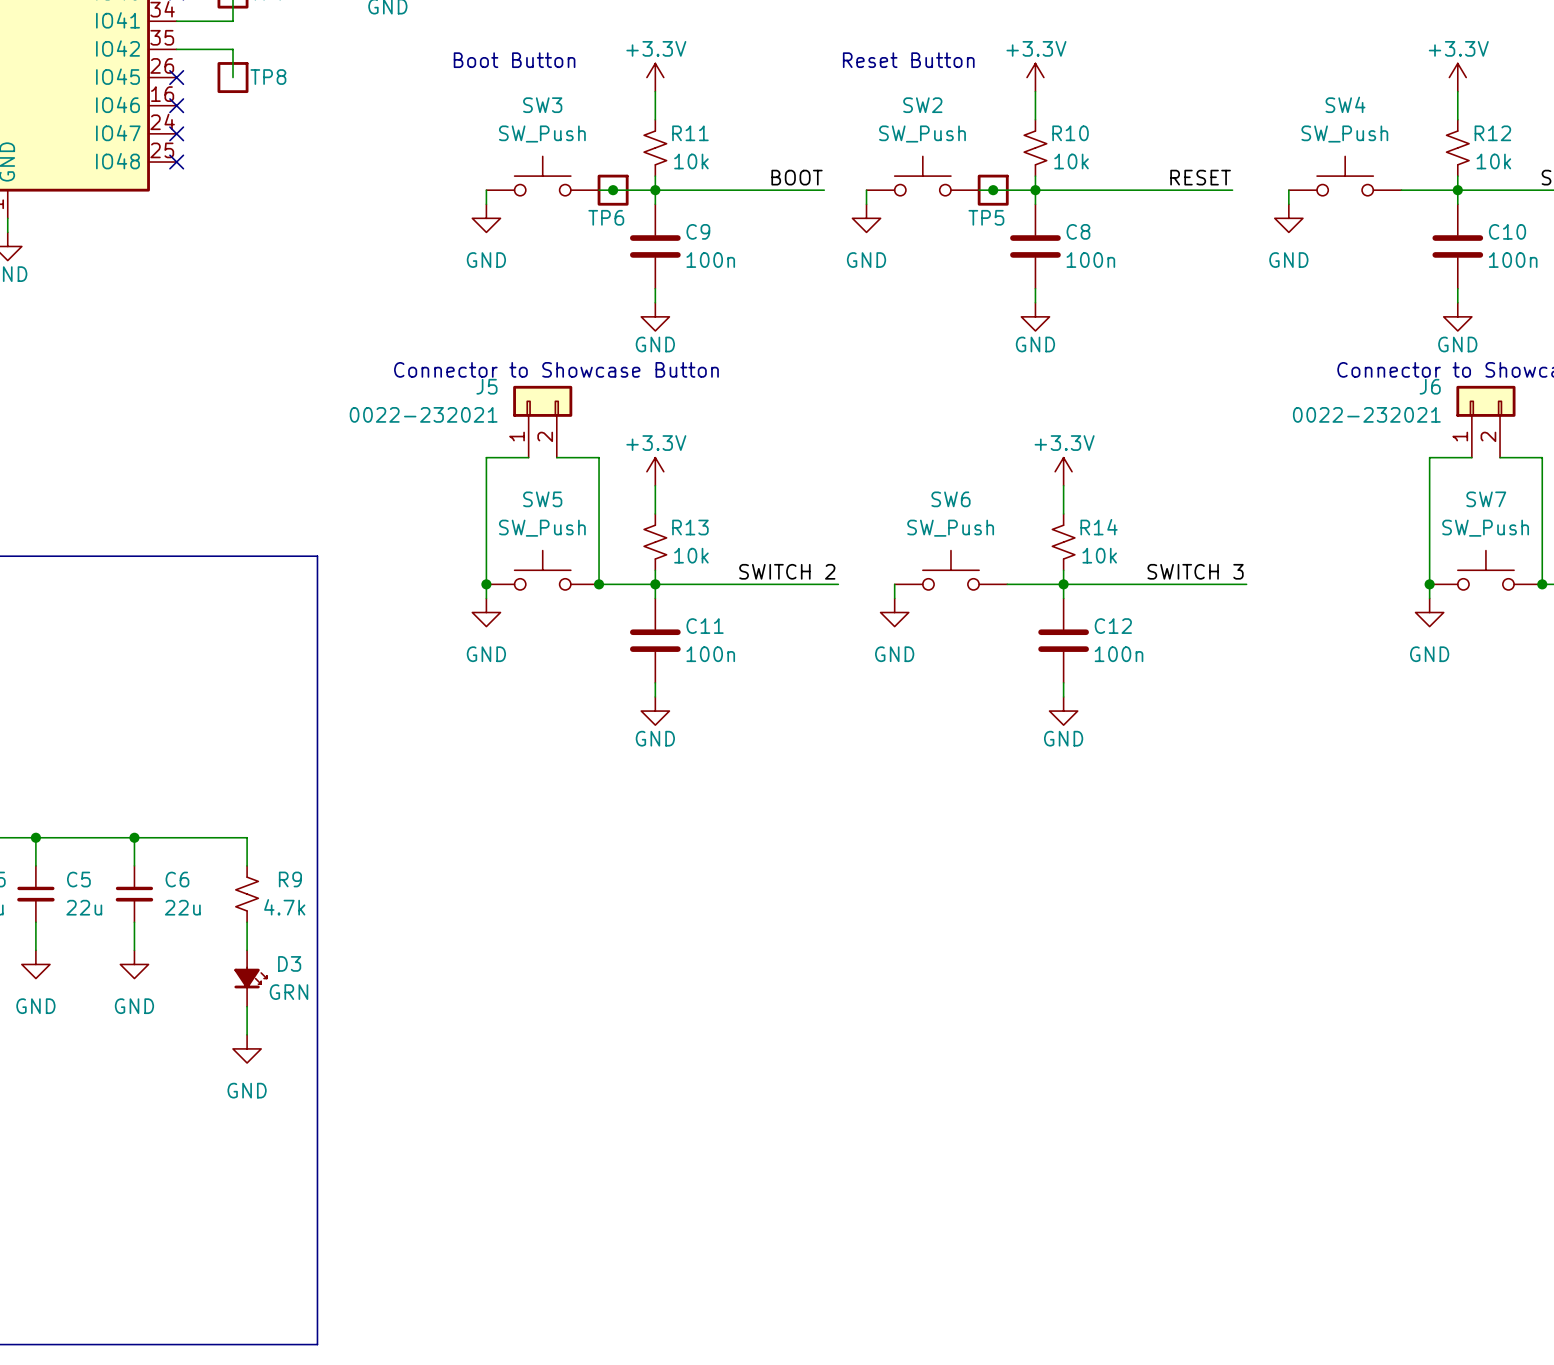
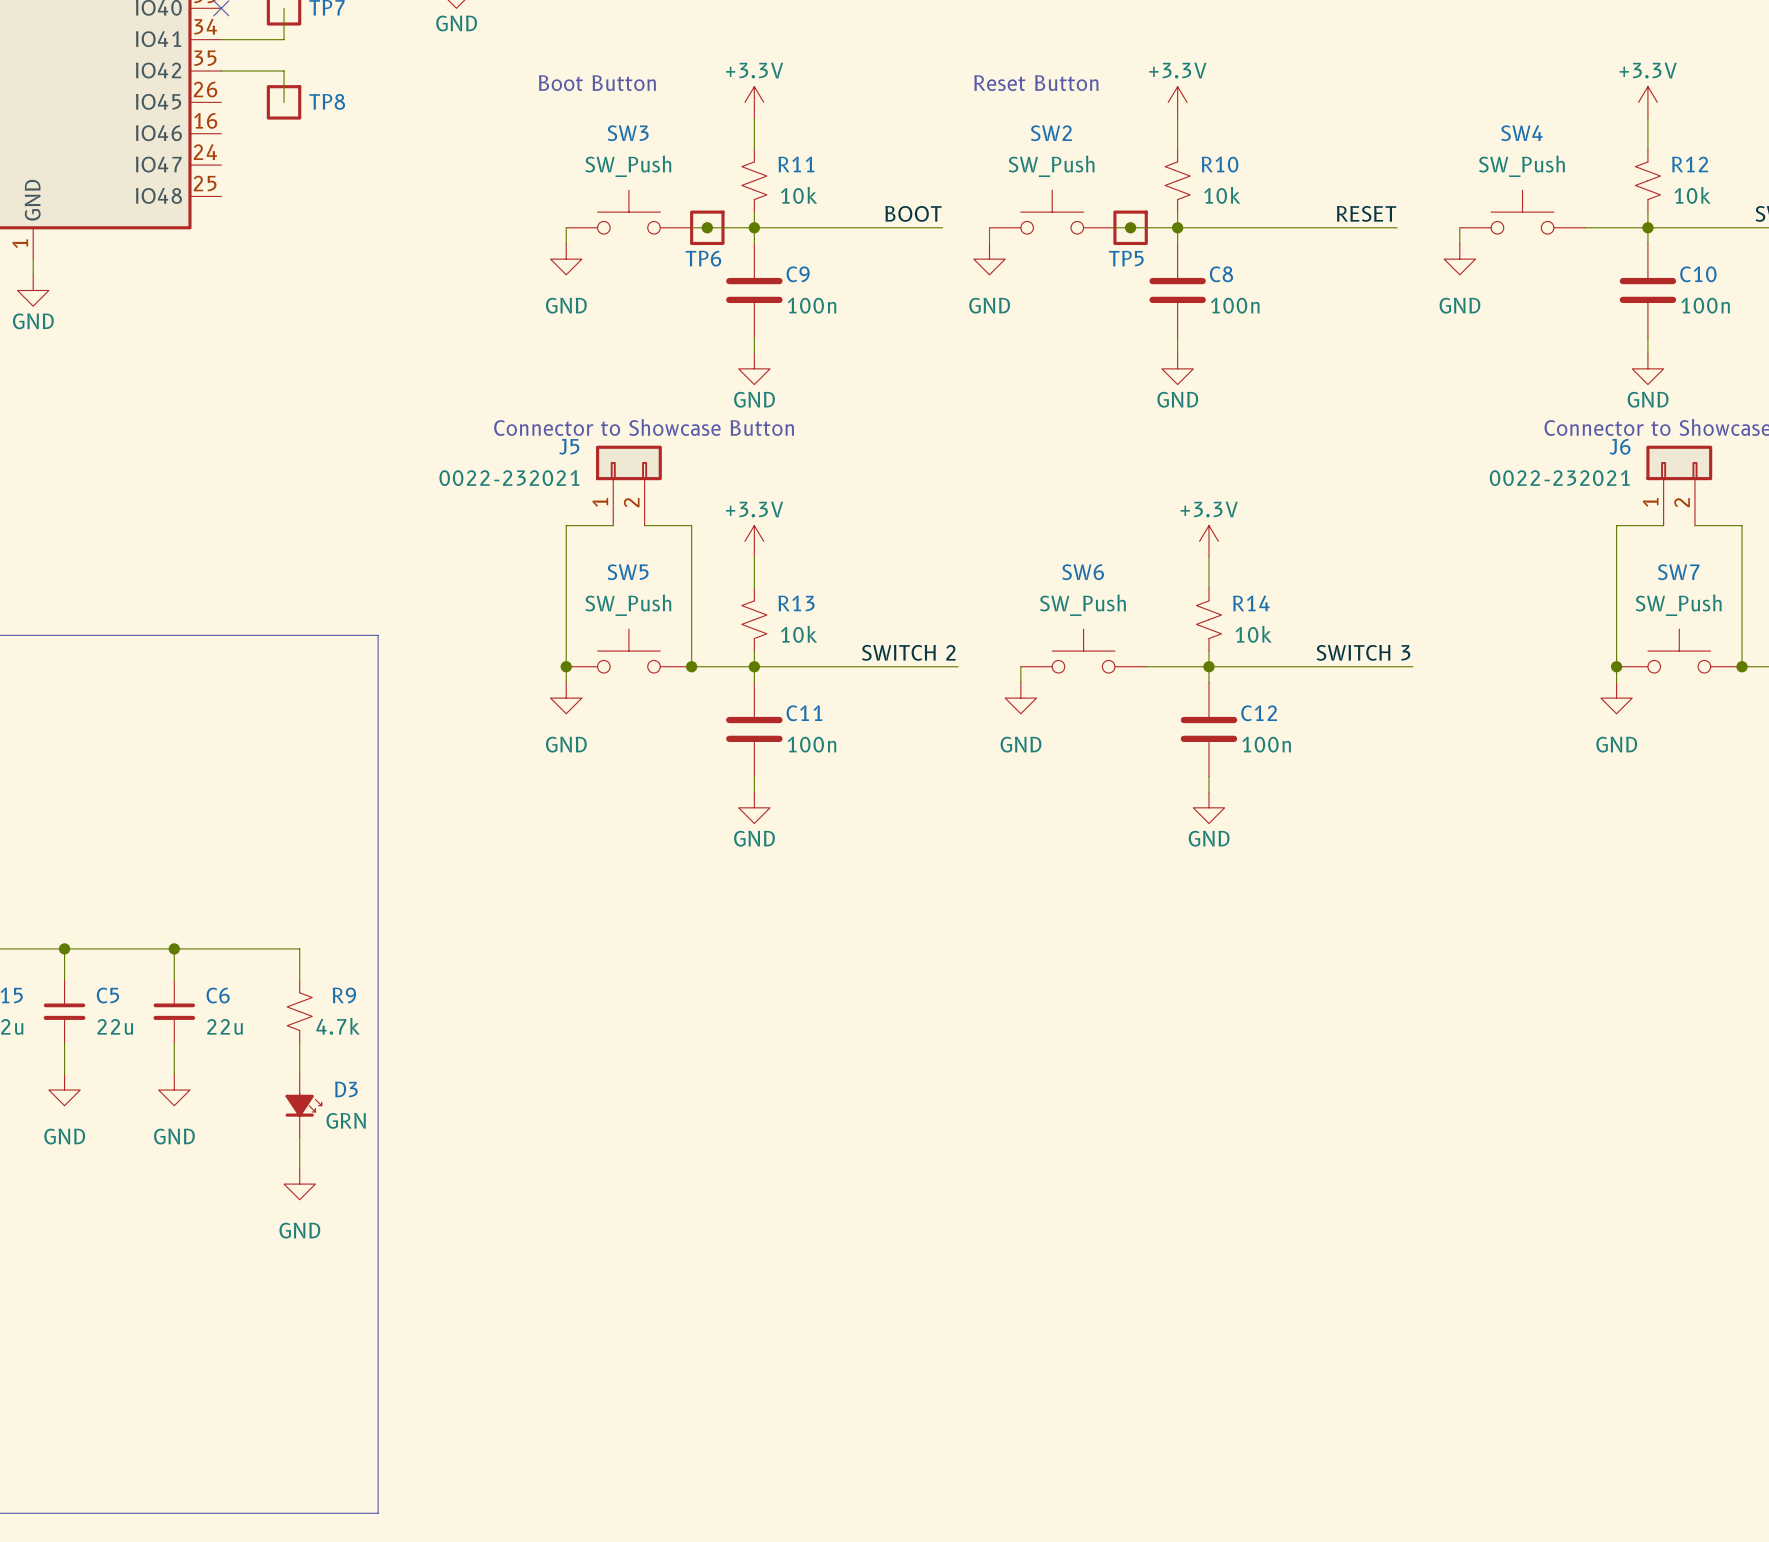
no-connect mark: (176, 77) -> none
no-connect mark: (176, 105) -> none
no-connect mark: (176, 133) -> none
no-connect mark: (176, 162) -> none

